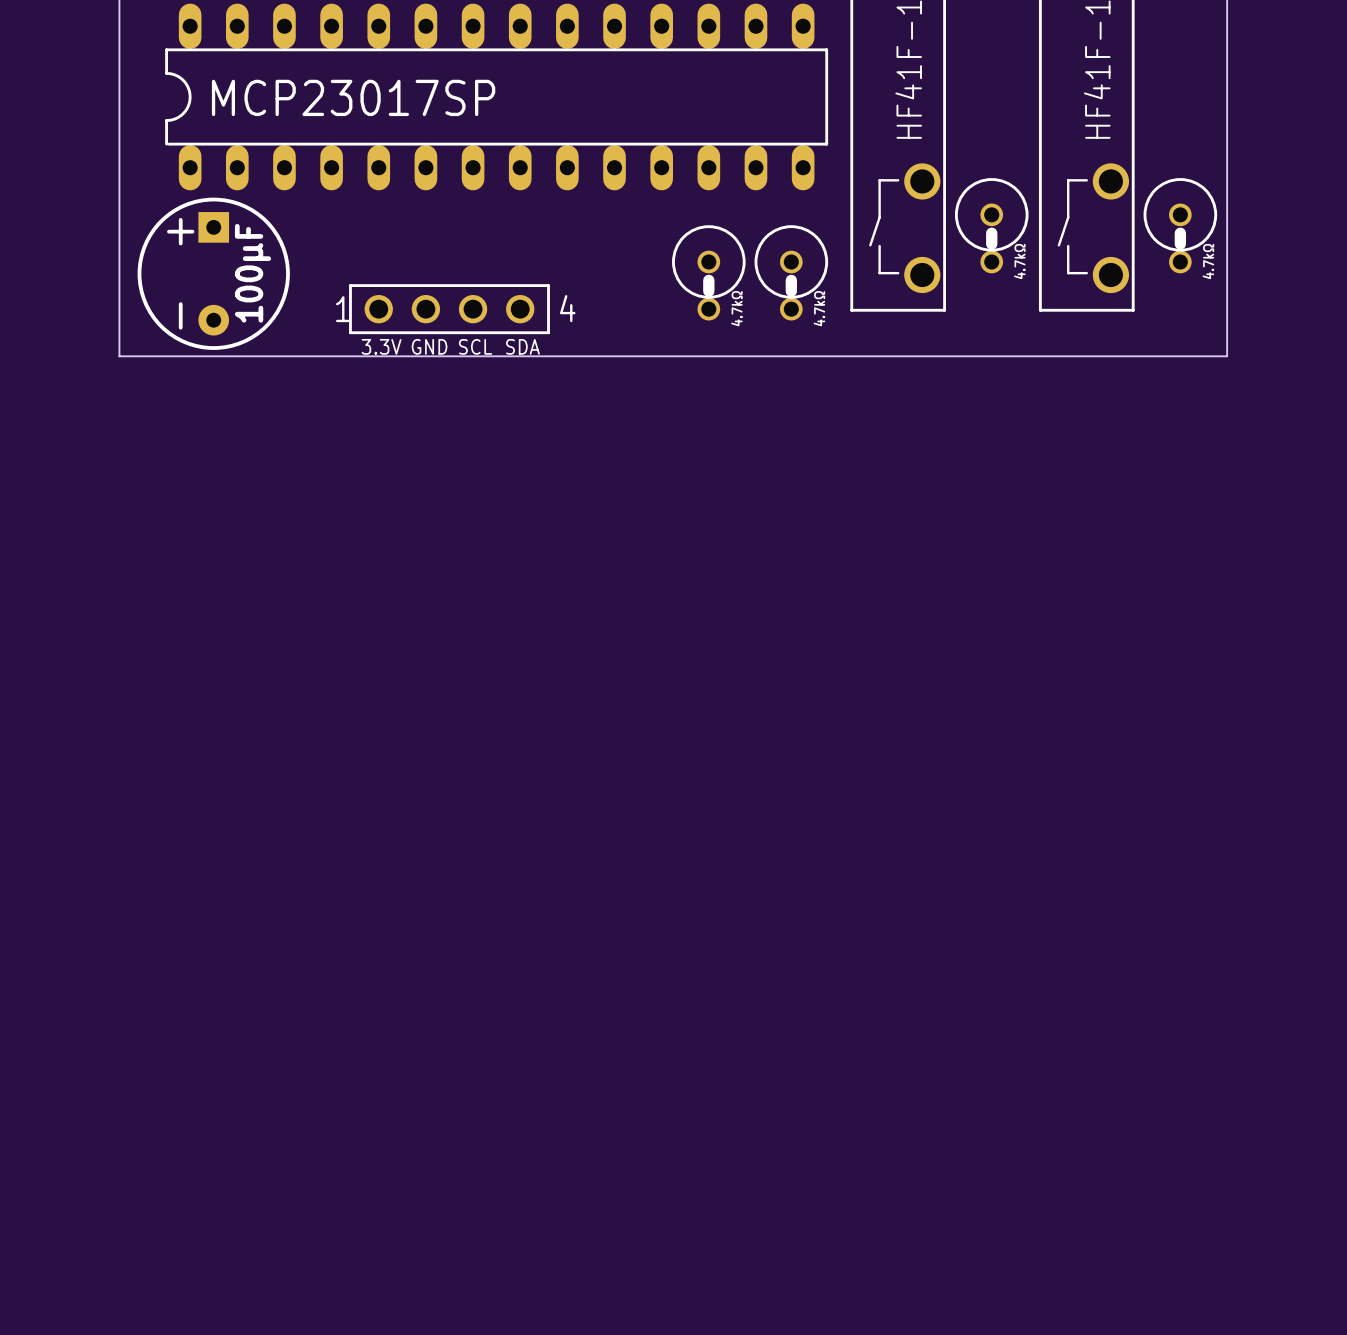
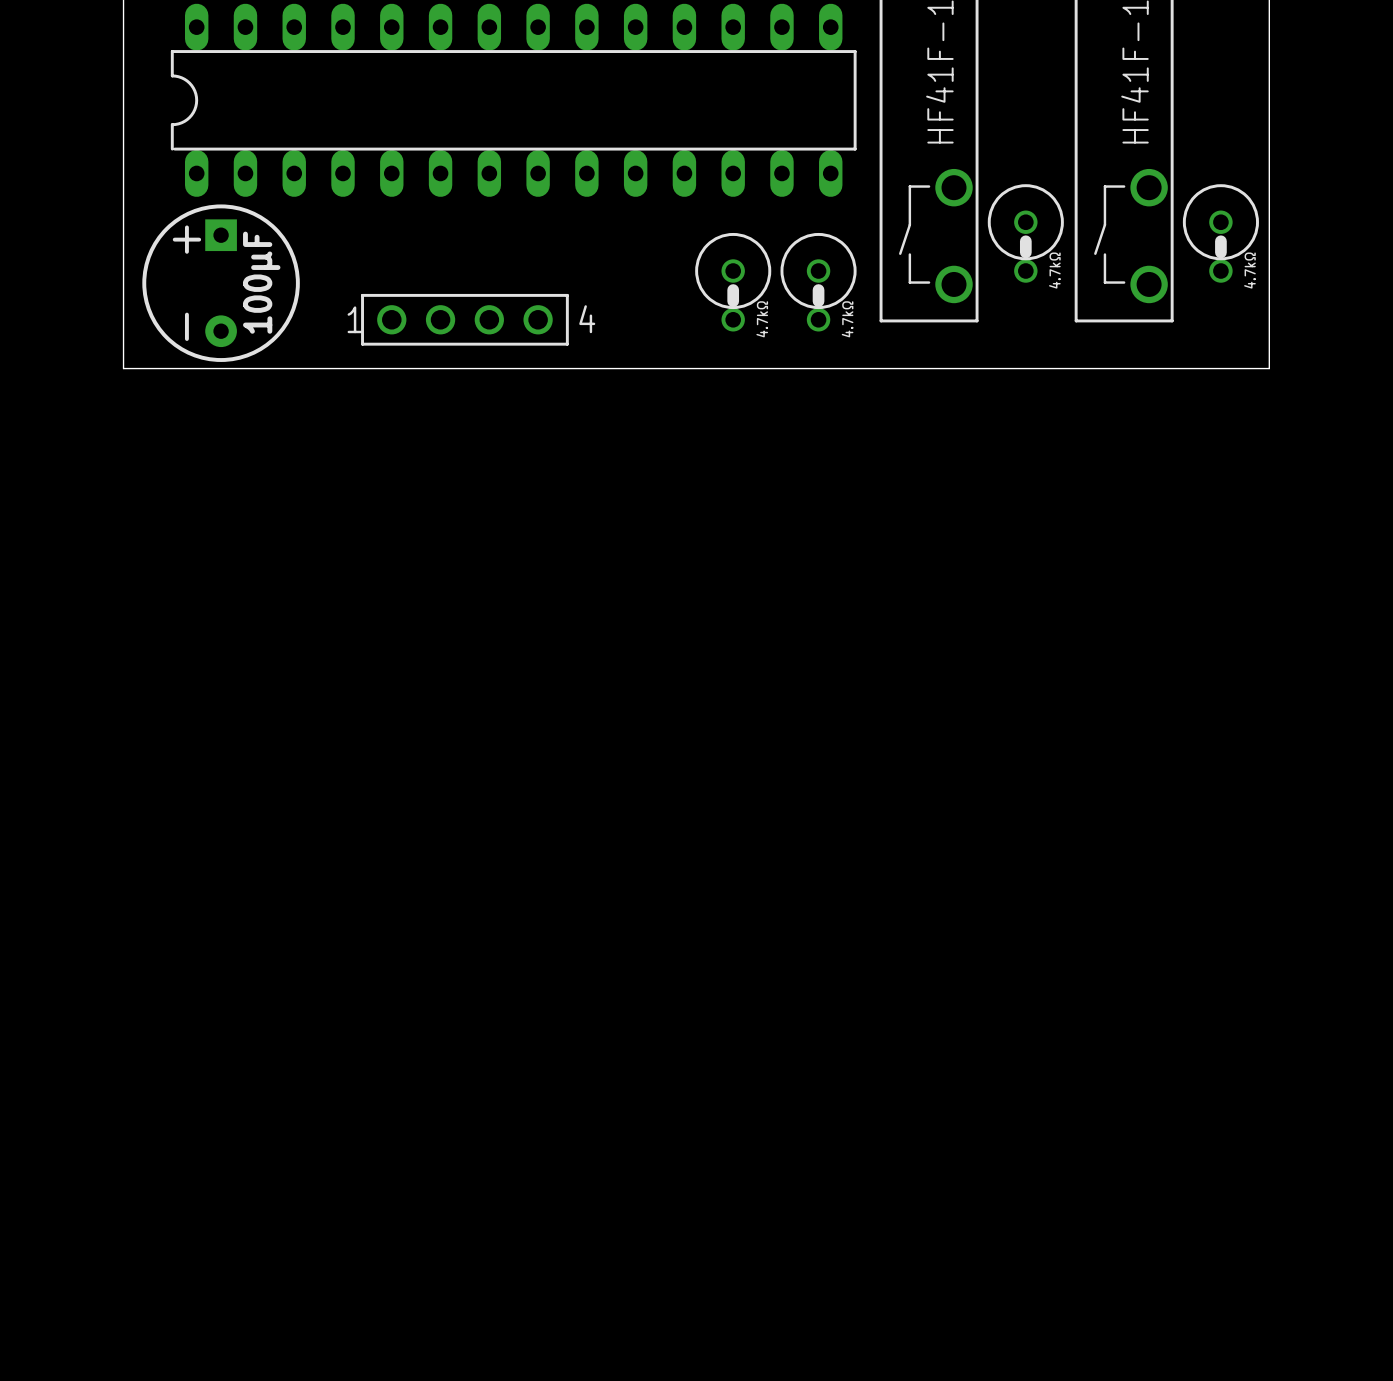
part value: MCP23017SP (353, 97) -> none
text: 3.3V (381, 346) -> none
text: GND (429, 346) -> none
text: SCL (475, 346) -> none
text: SDA (522, 346) -> none

